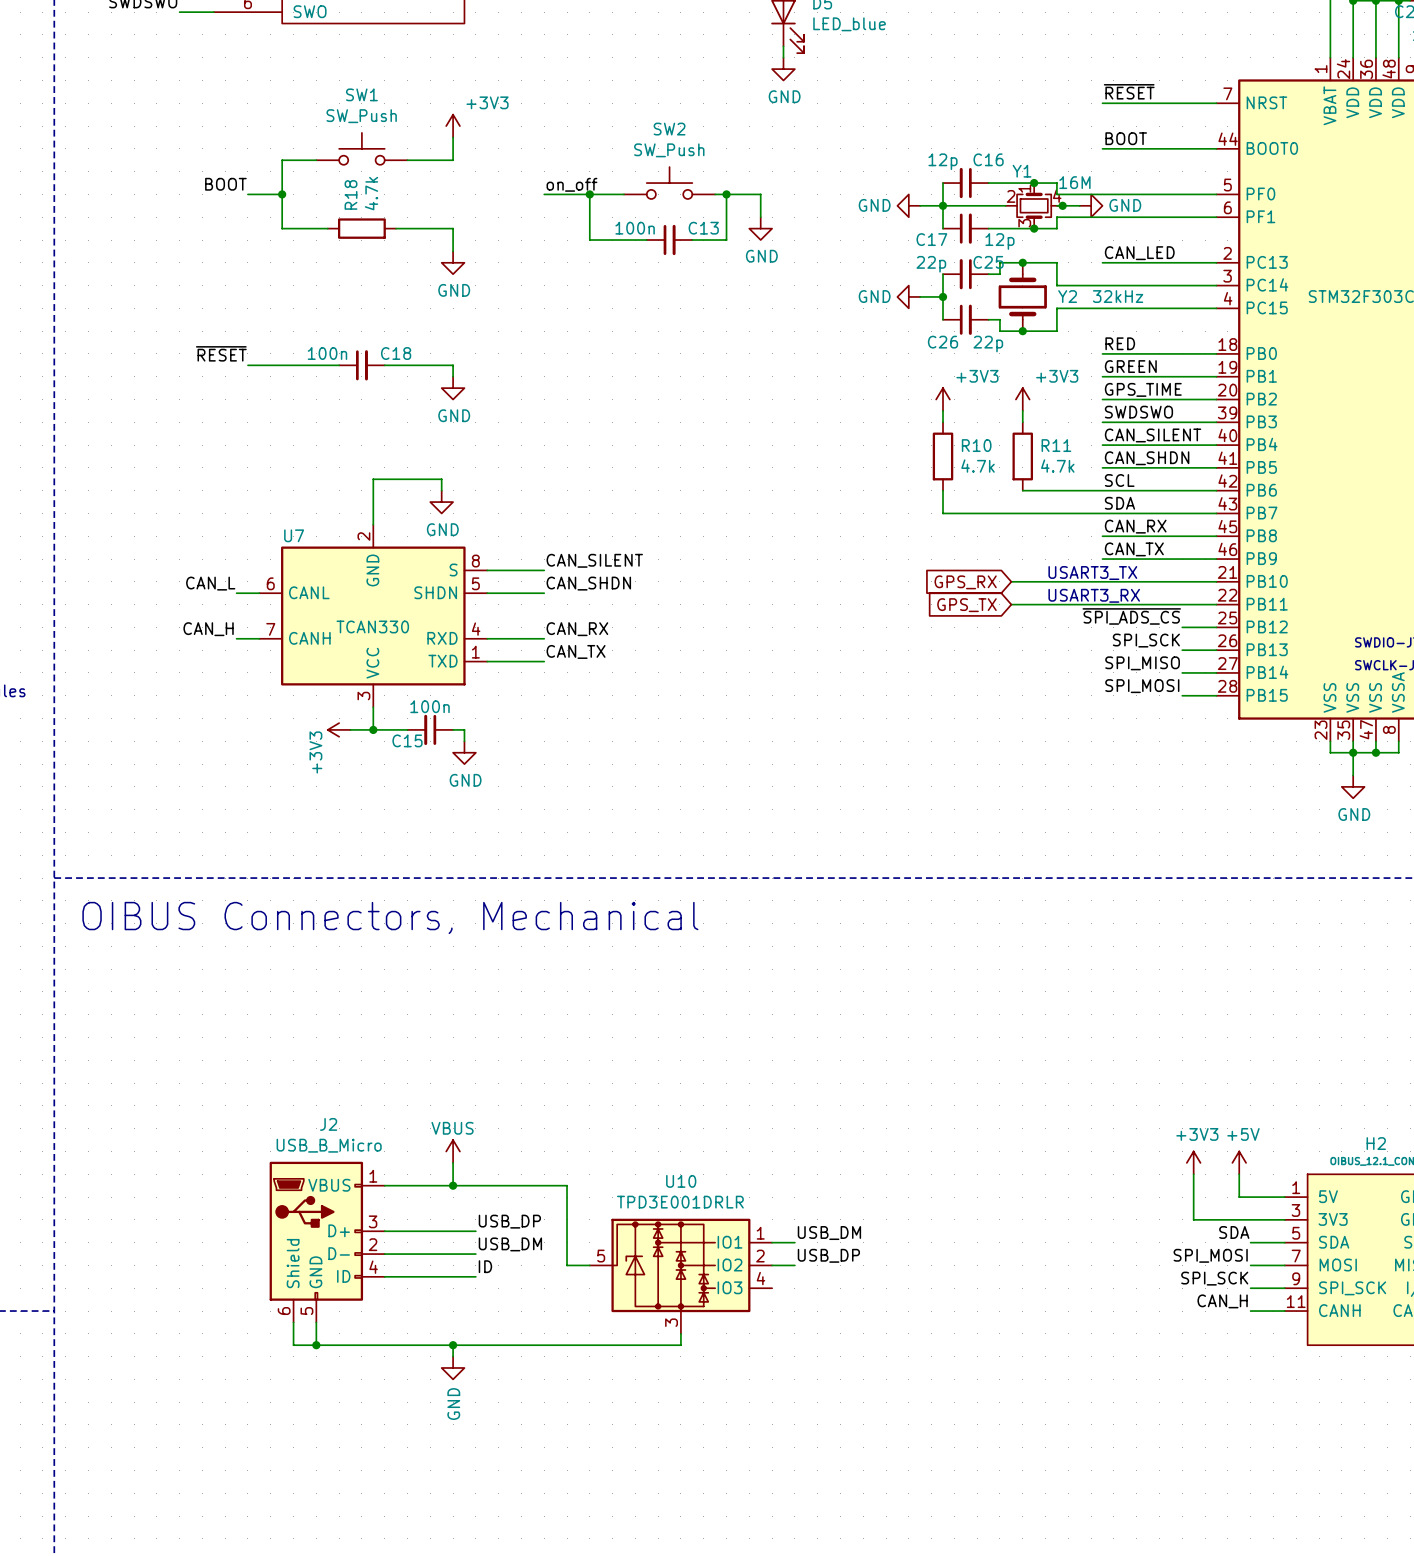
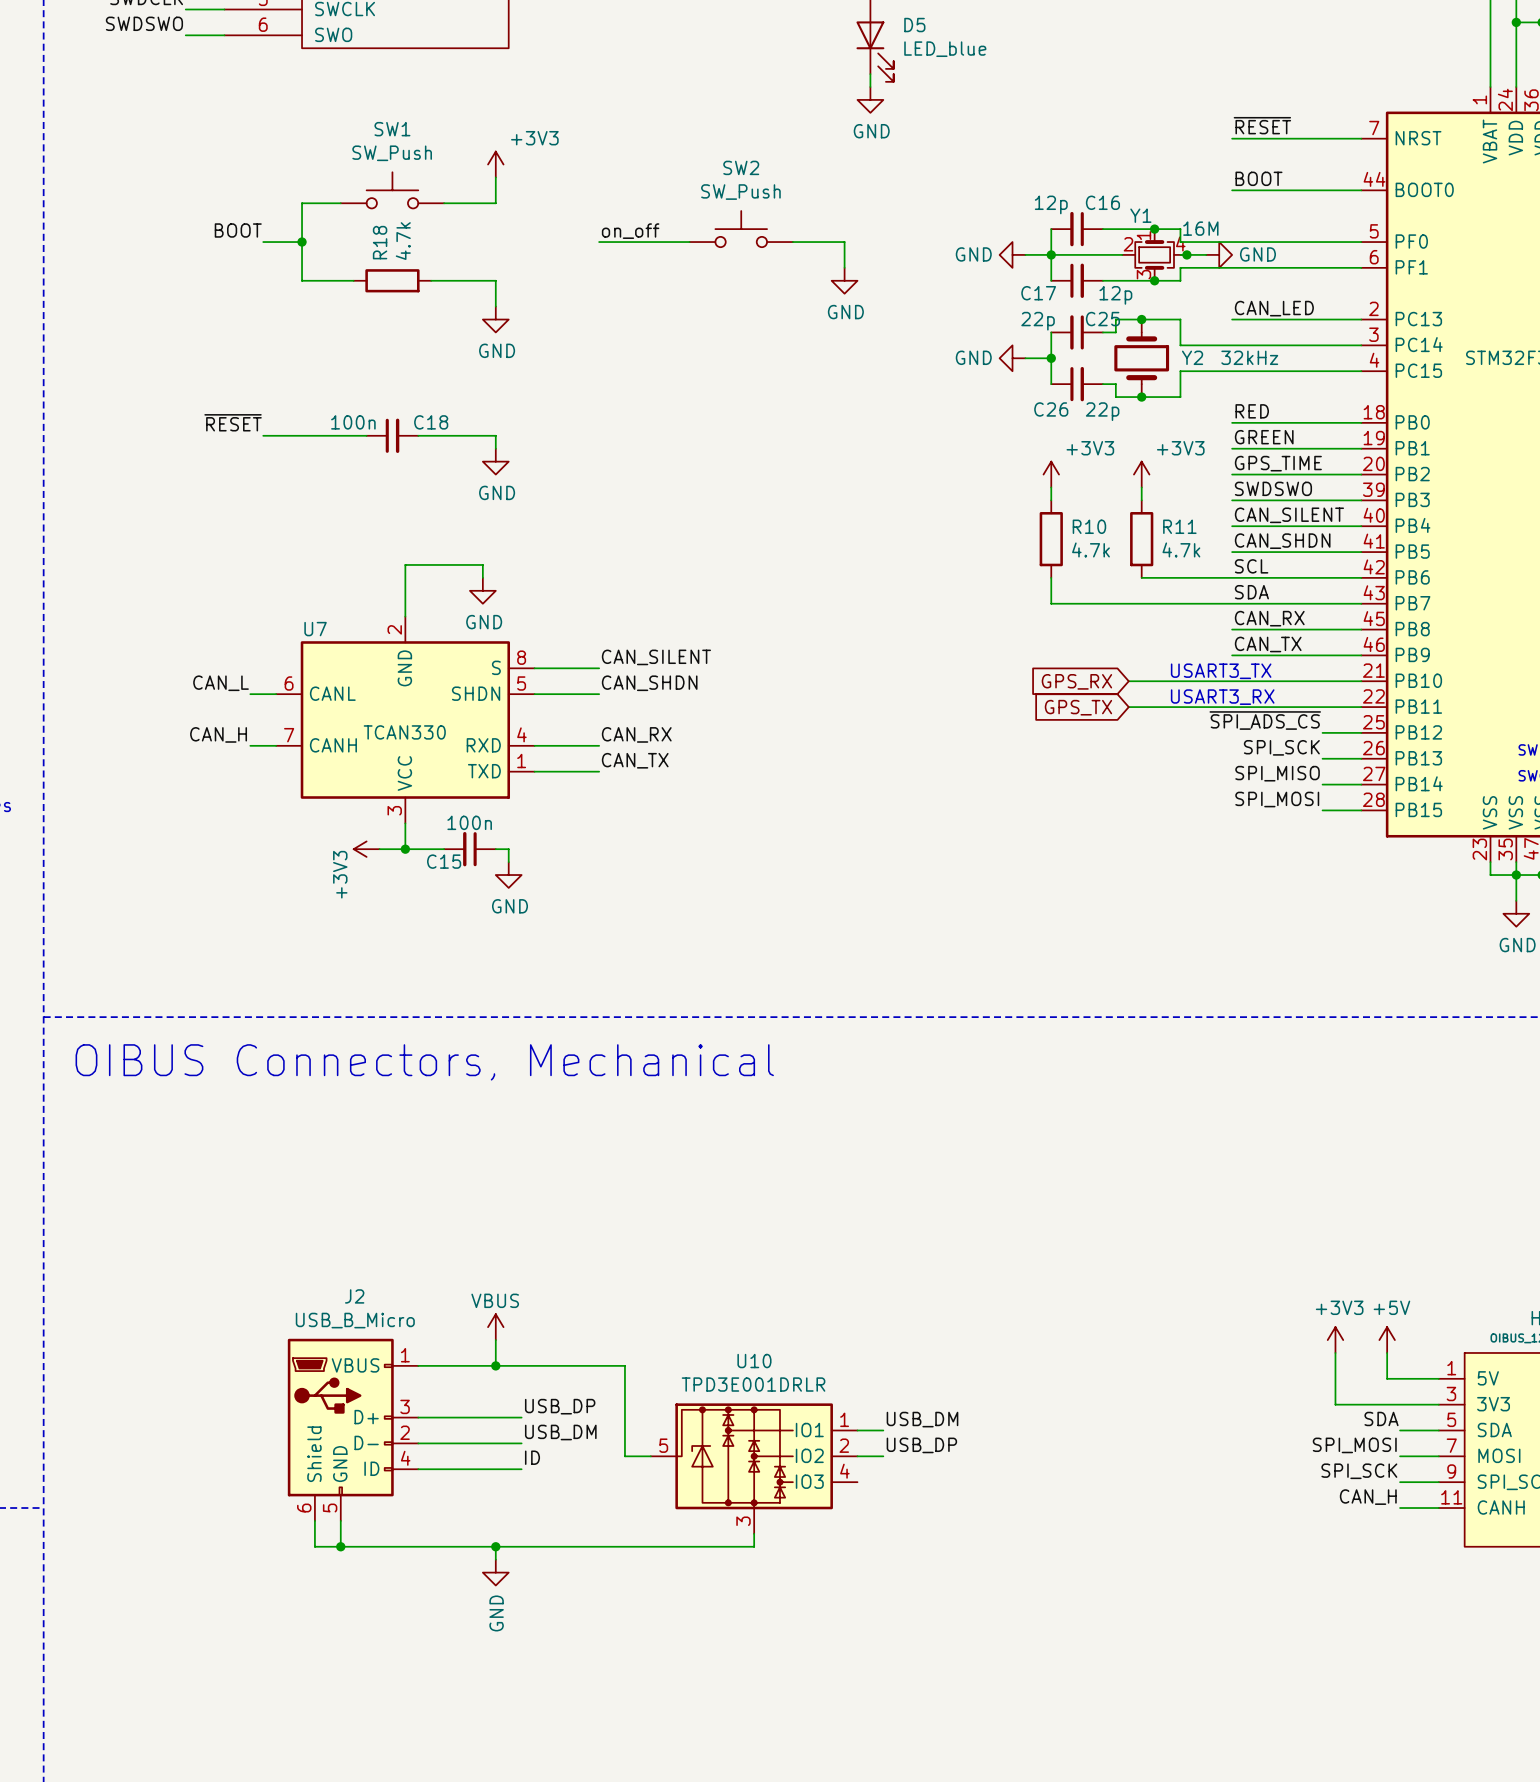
wire: (589, 194) (589, 240) (646, 240) -> none
junction: (589, 194) -> none
wire: (726, 194) (726, 240) (692, 240) -> none
junction: (726, 194) -> none
C13: 100n (669, 240) -> none

